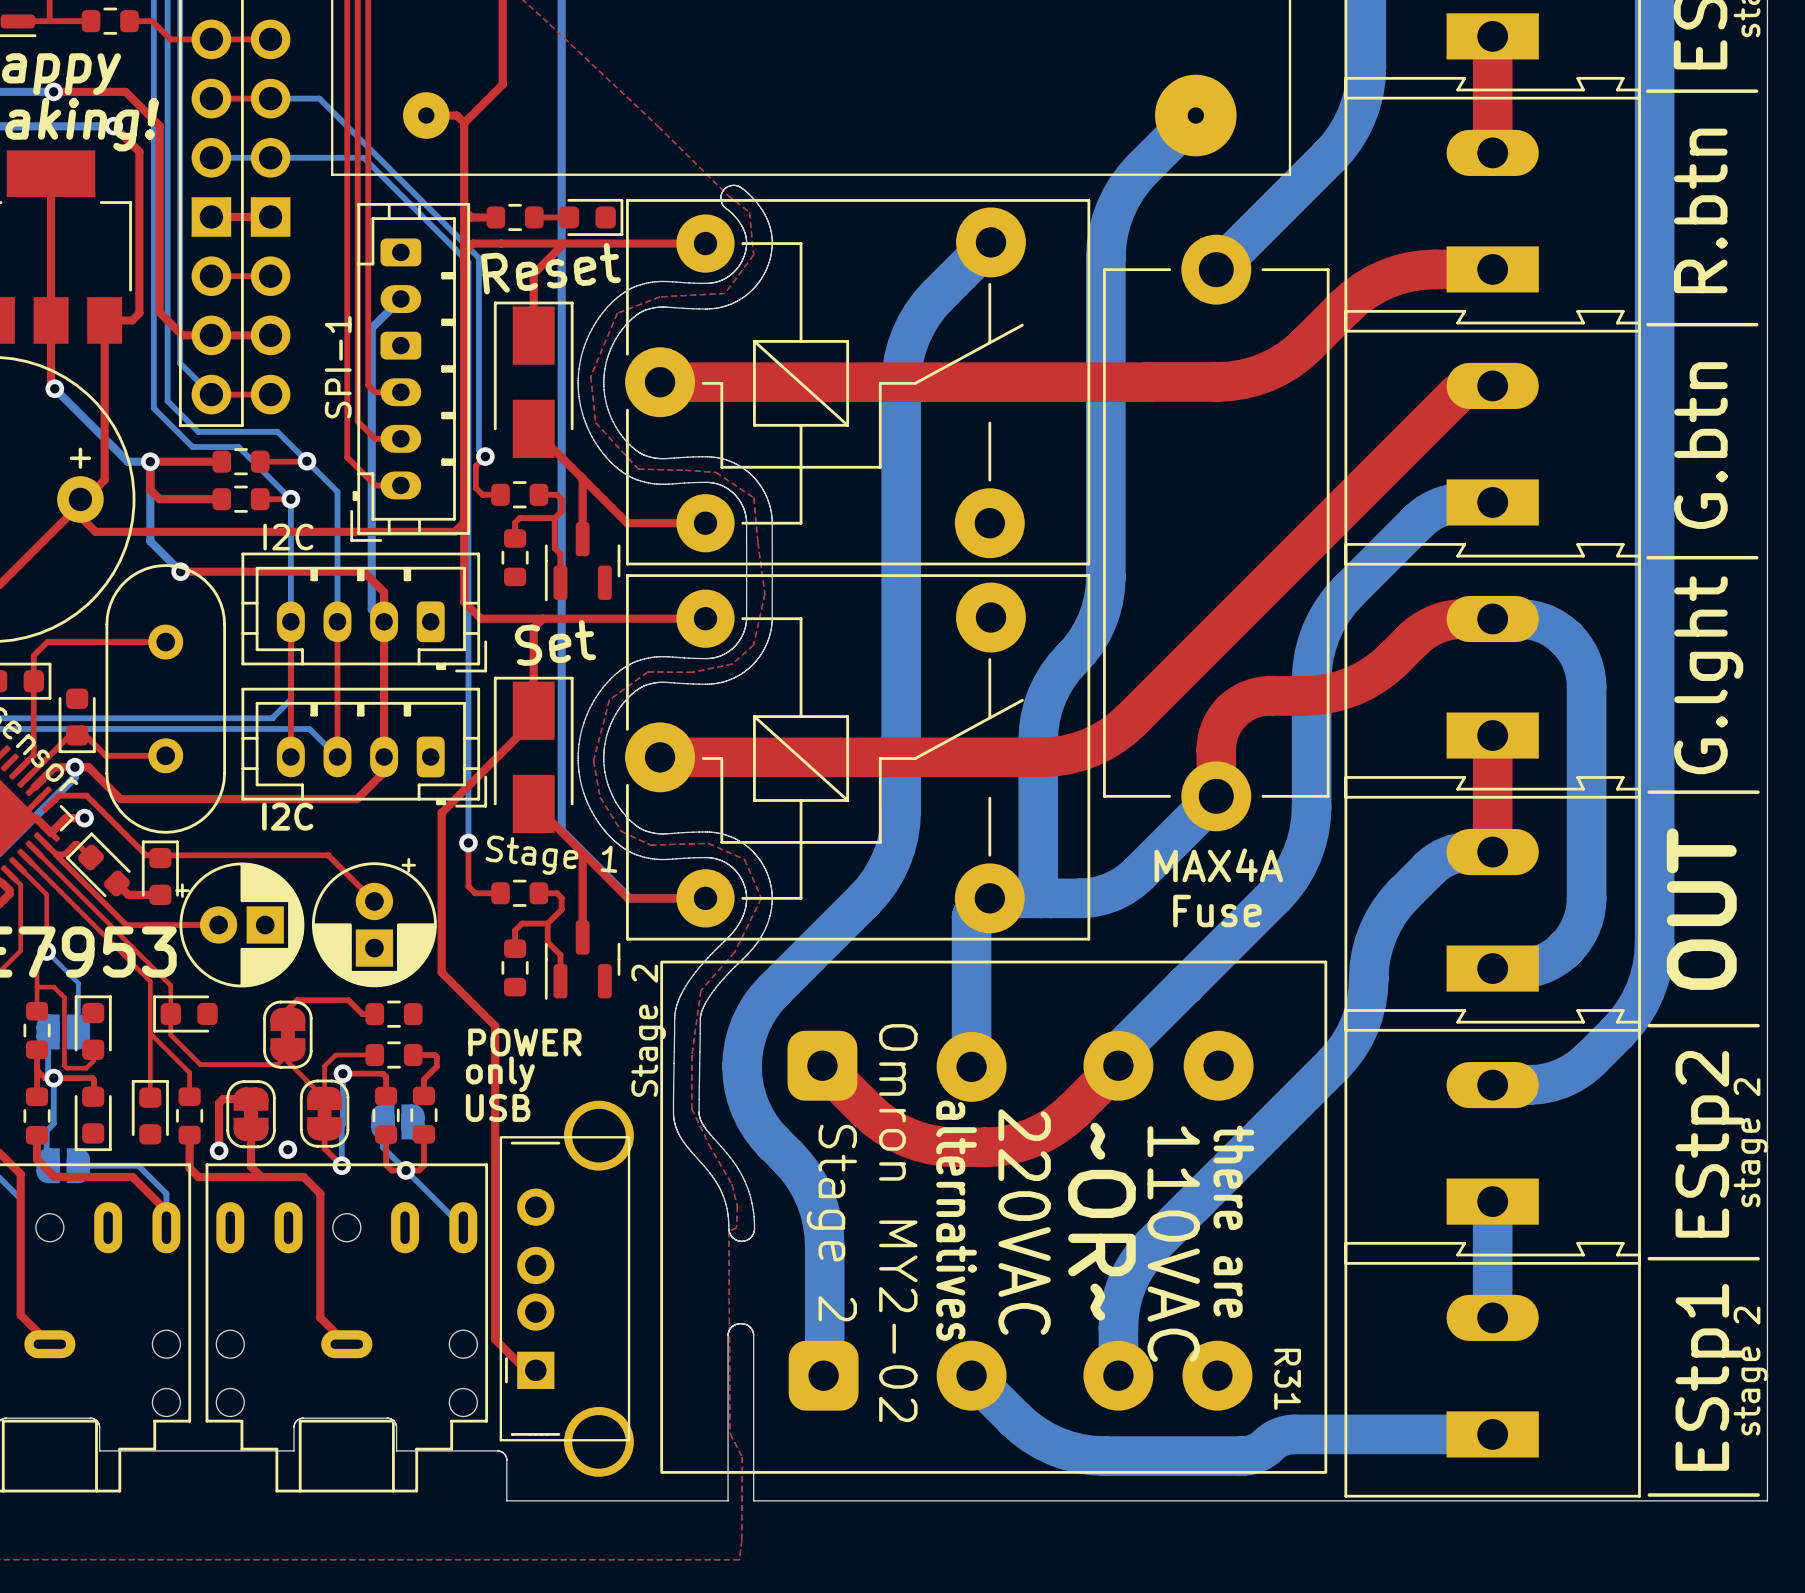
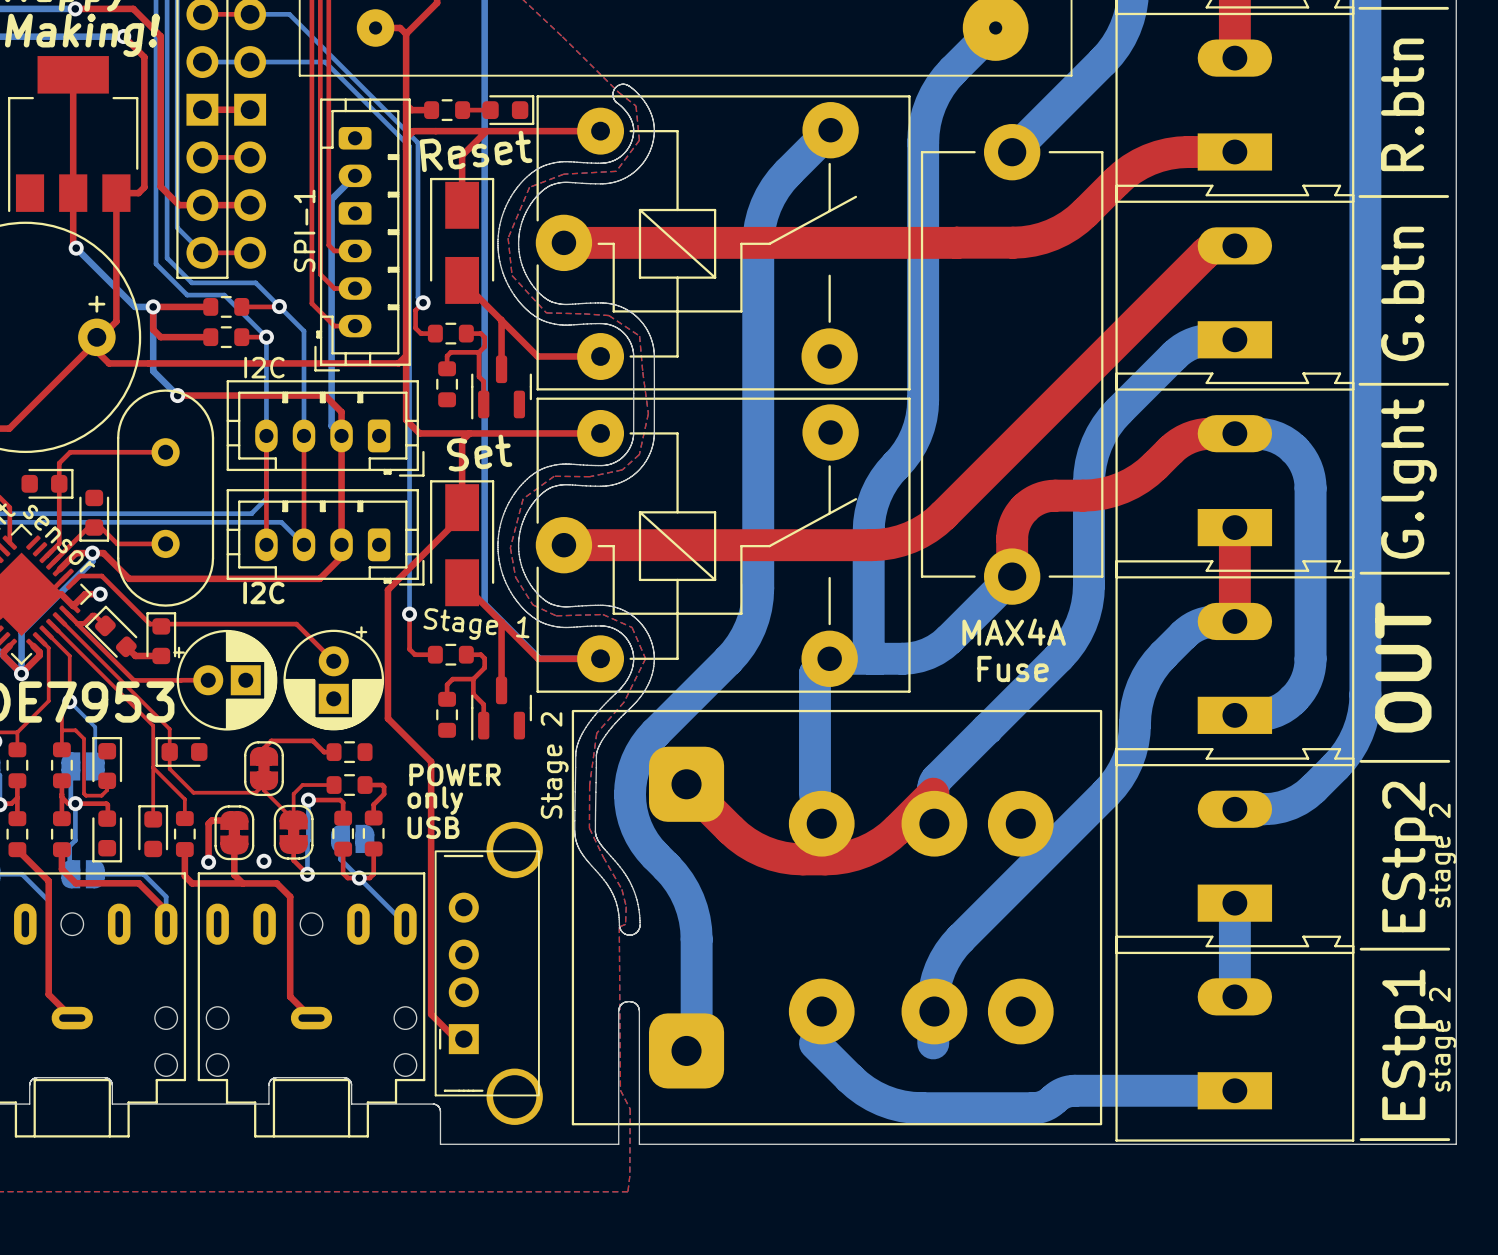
R31: (993, 1217) -> none
part: none -> (837, 917)

